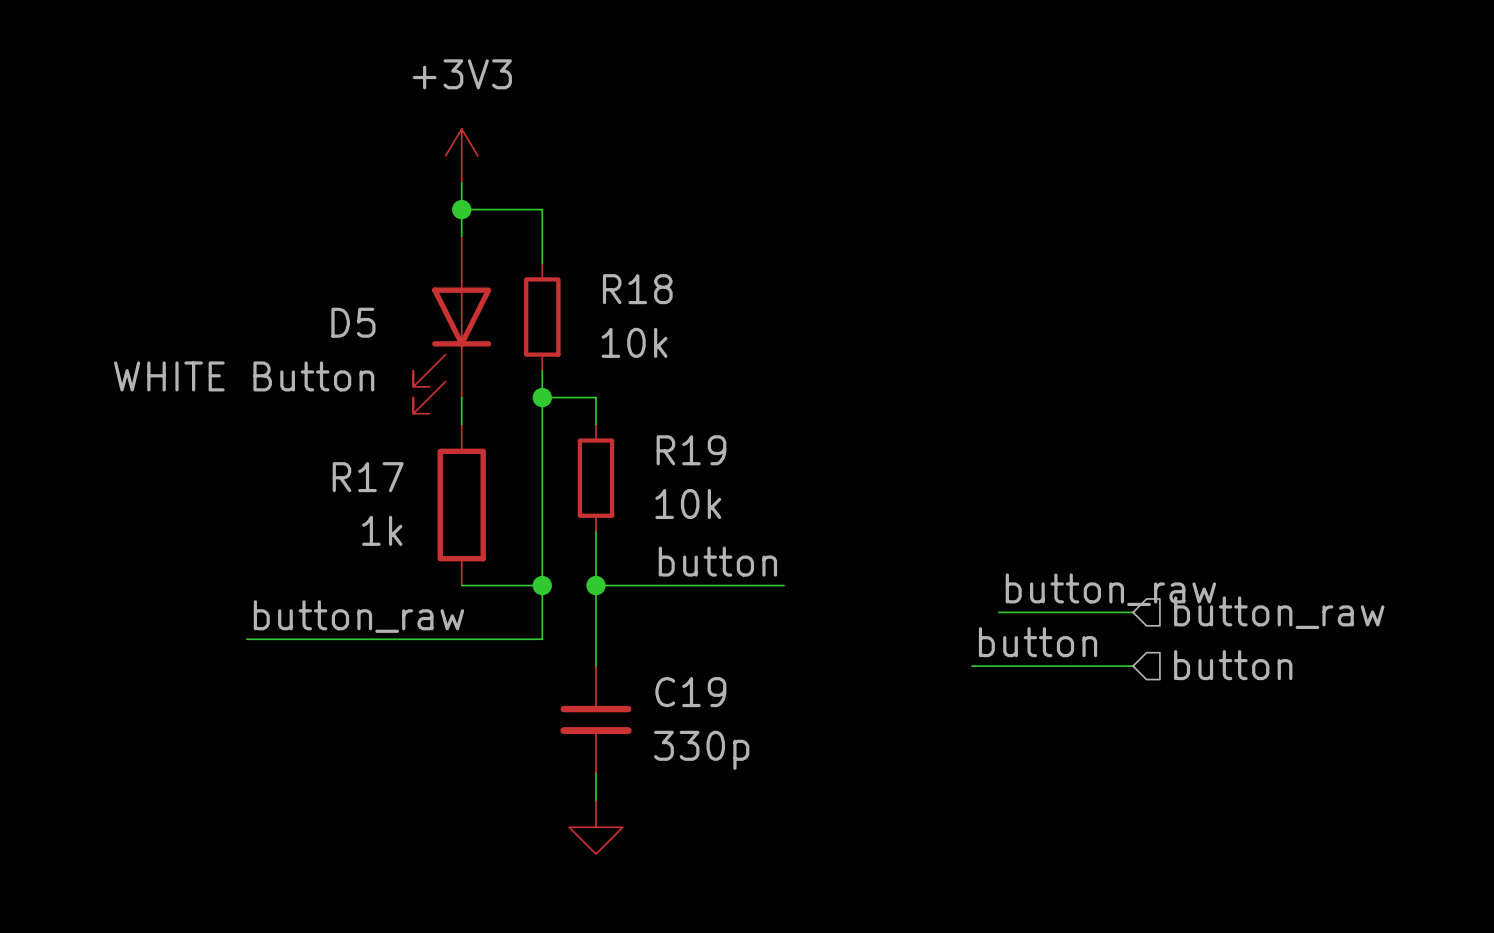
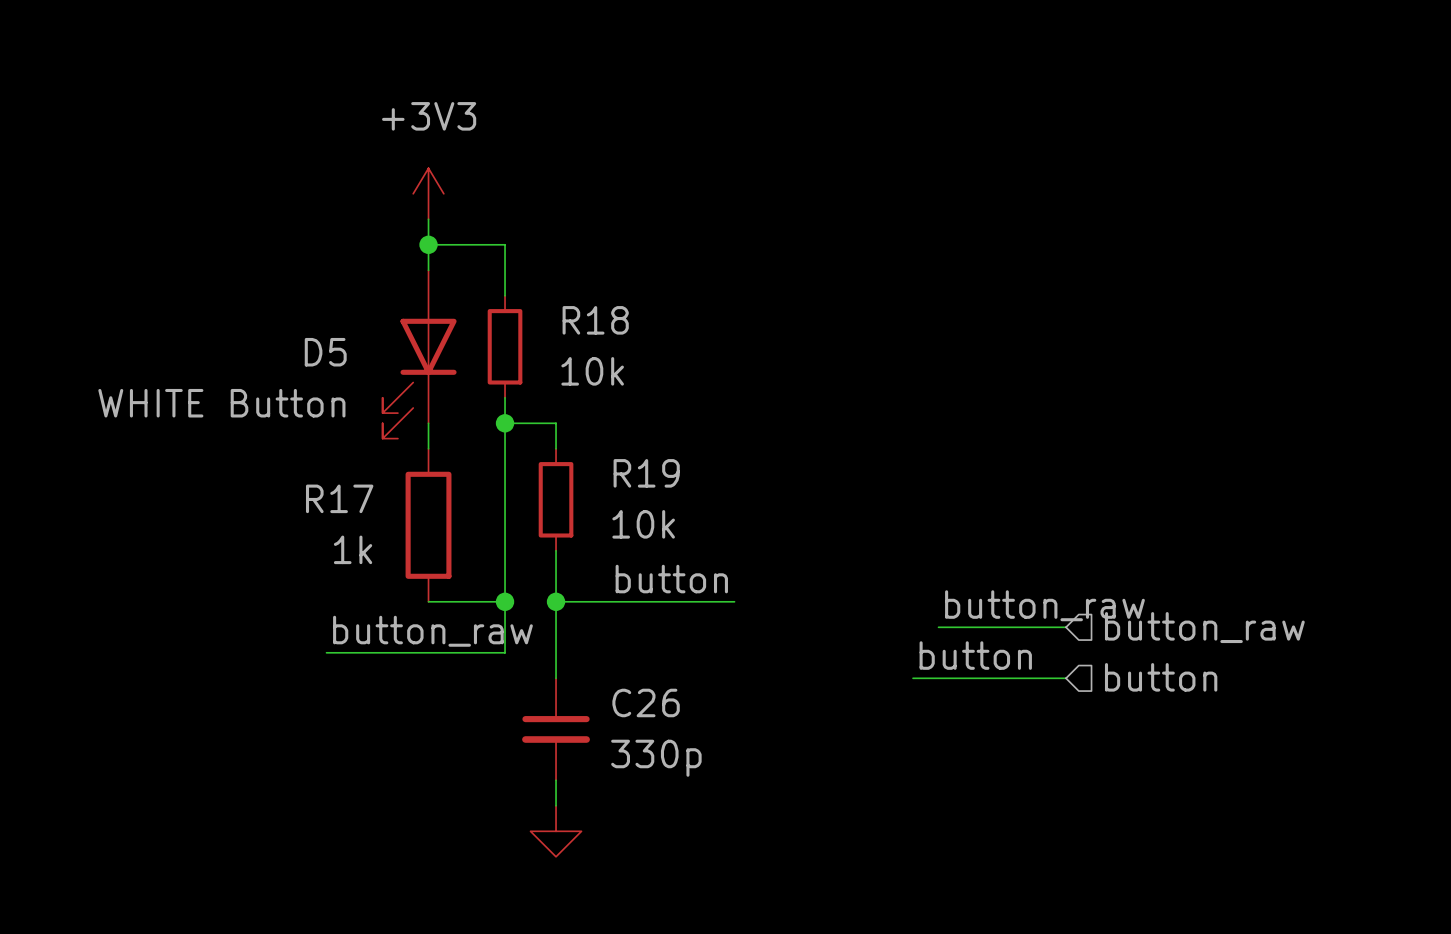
label position: button_raw (358, 616) -> button_raw (432, 631)
wire: (246, 639) (354, 639) -> none
C19 name: C19 (690, 692) -> C26 (646, 702)

